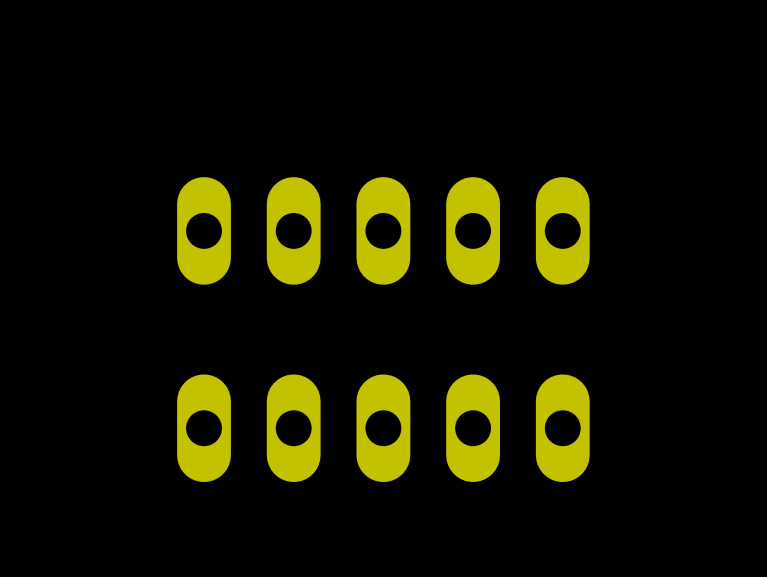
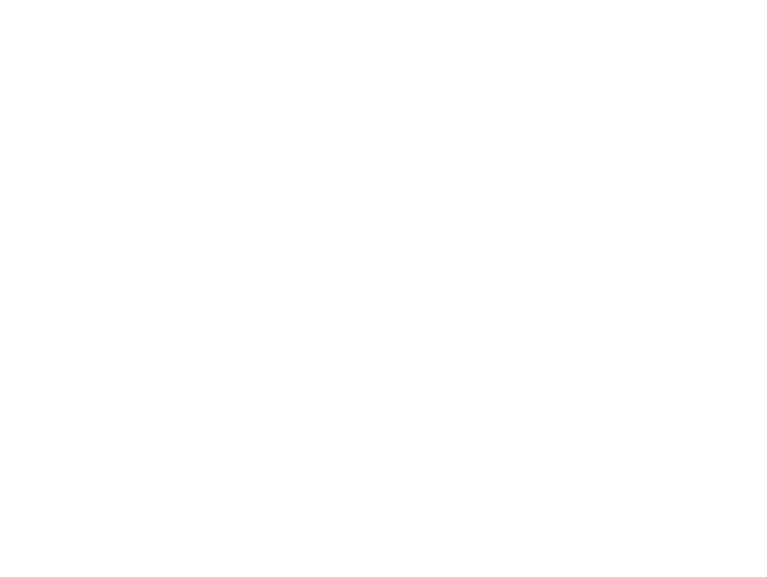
part: (383, 230) -> none
part: (383, 428) -> none

